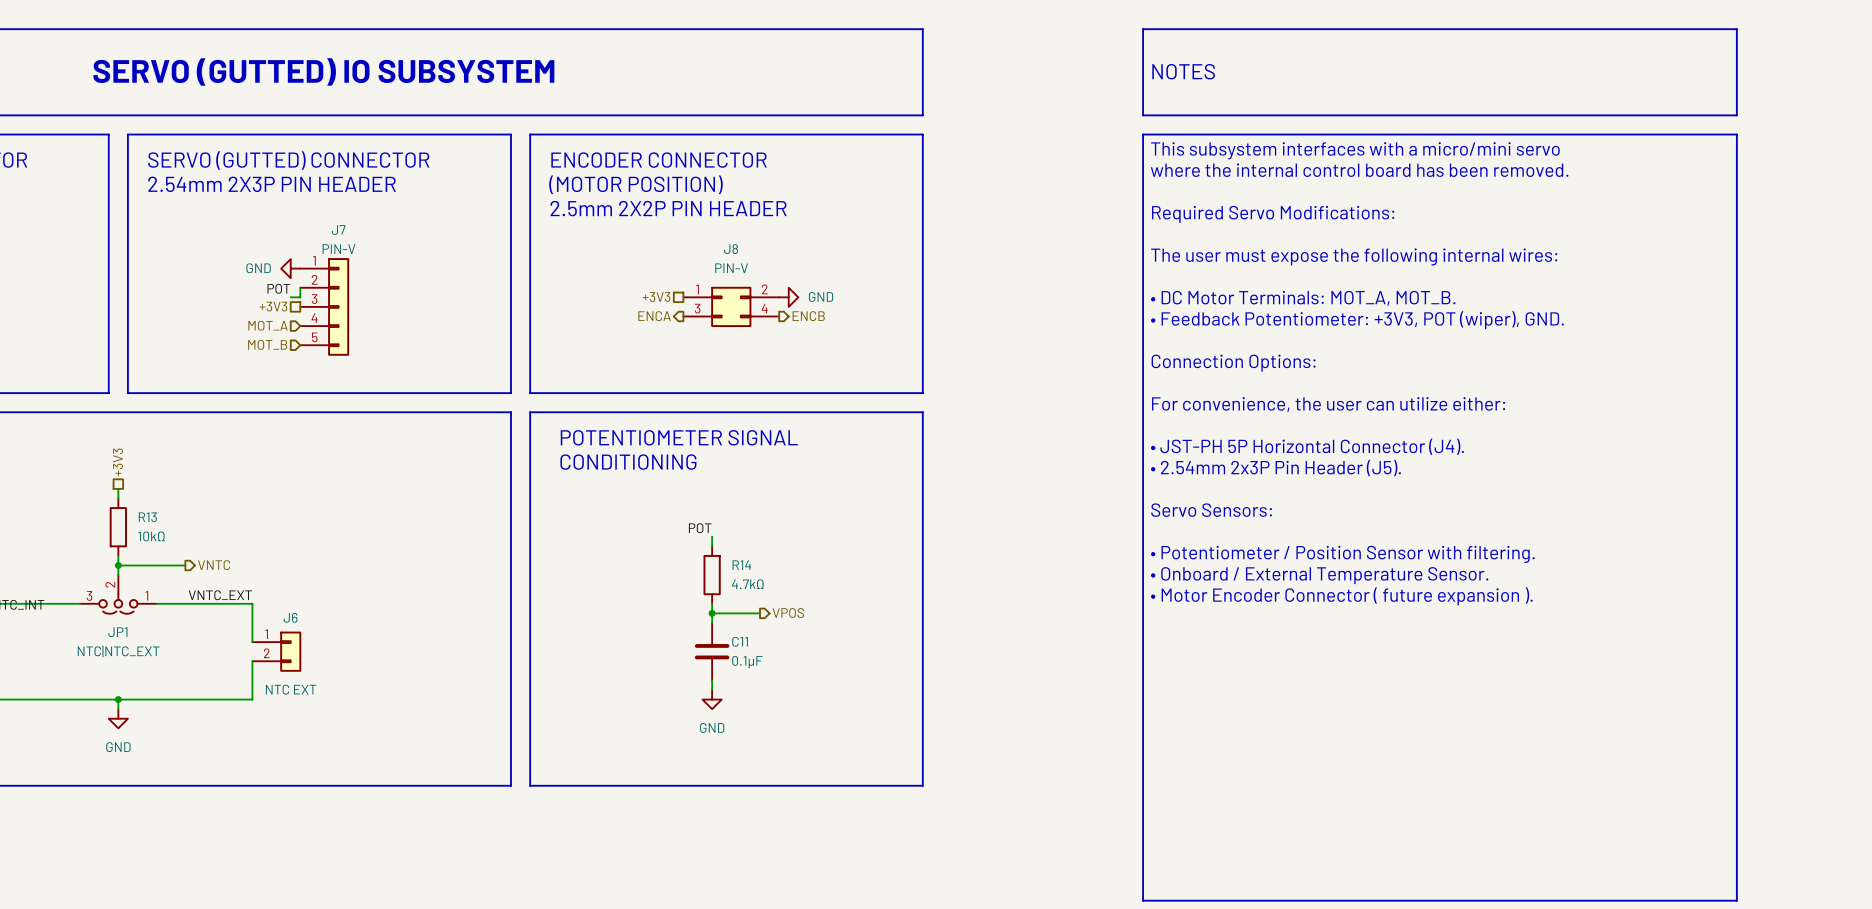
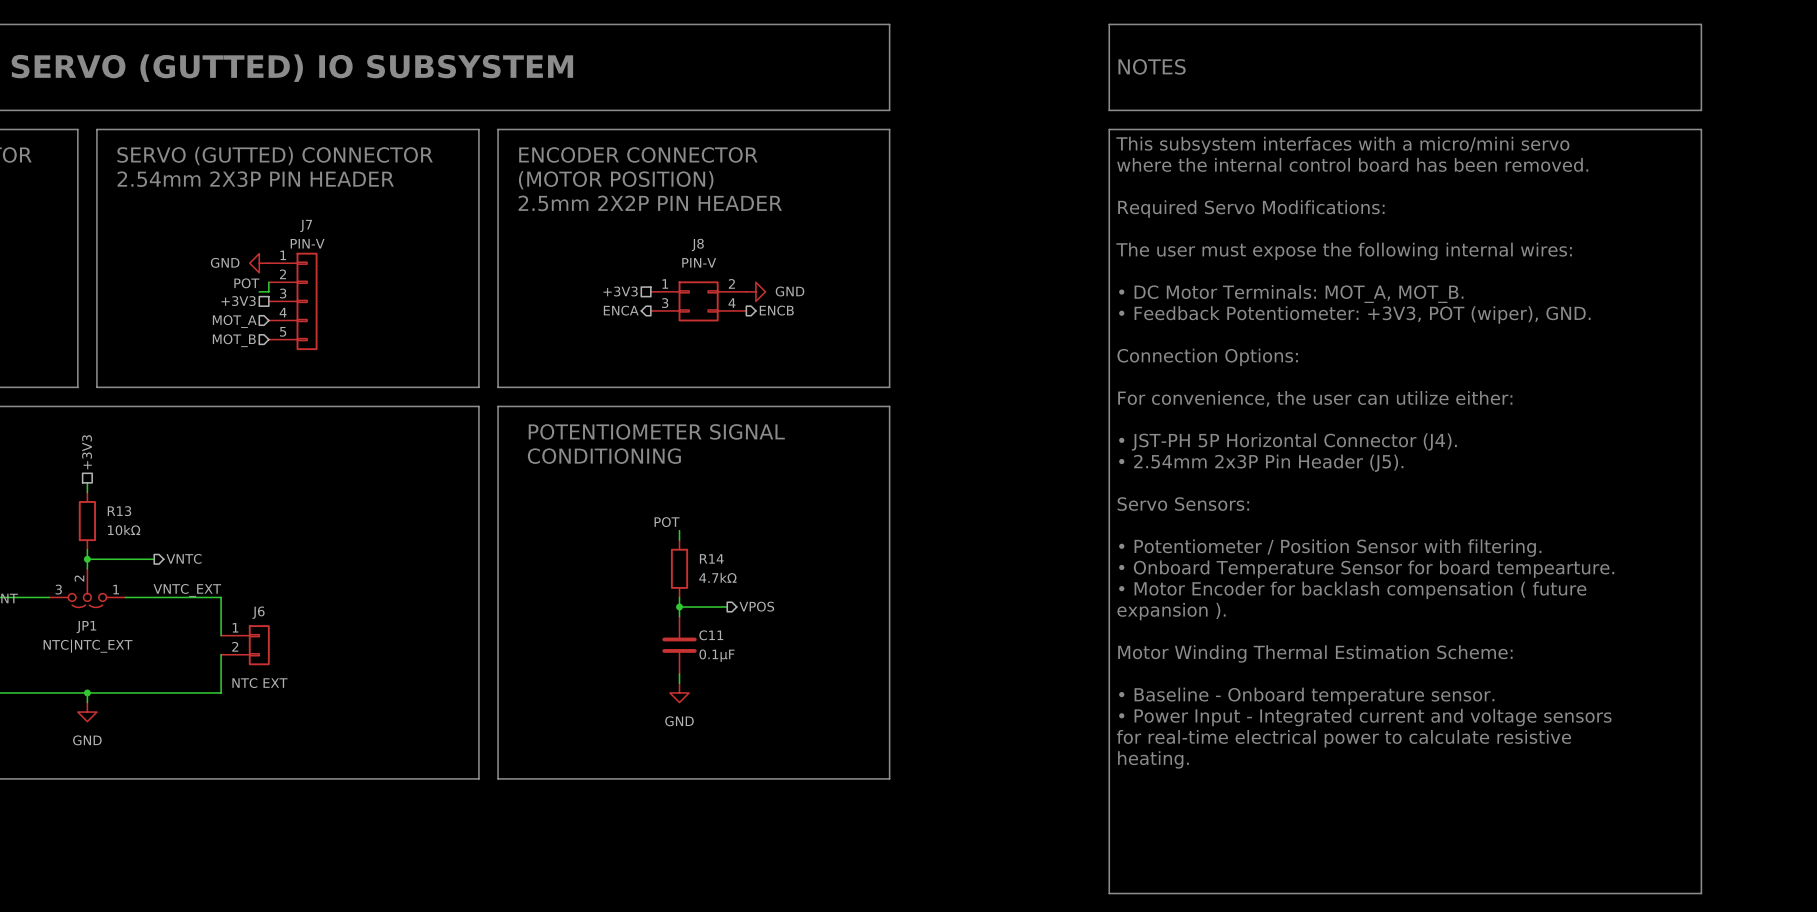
text: • Onboard / External Temperature Sensor. (1319, 575) -> • Onboard Temperature Sensor for board tempearture. (1366, 569)
text: • Motor Encoder Connector ( future expansion ). (1341, 596) -> • Motor Encoder for backlash compensation ( future (1352, 590)
text: none -> expansion ). (1171, 611)
text: none -> Motor Winding Thermal Estimation Scheme: (1315, 653)
text: none -> • Baseline - Onboard temperature sensor. (1306, 696)
text: none -> • Power Input - Integrated current and voltage sensors (1365, 717)
text: none -> for real-time electrical power to calculate resistive (1343, 738)
text: none -> heating. (1153, 759)

